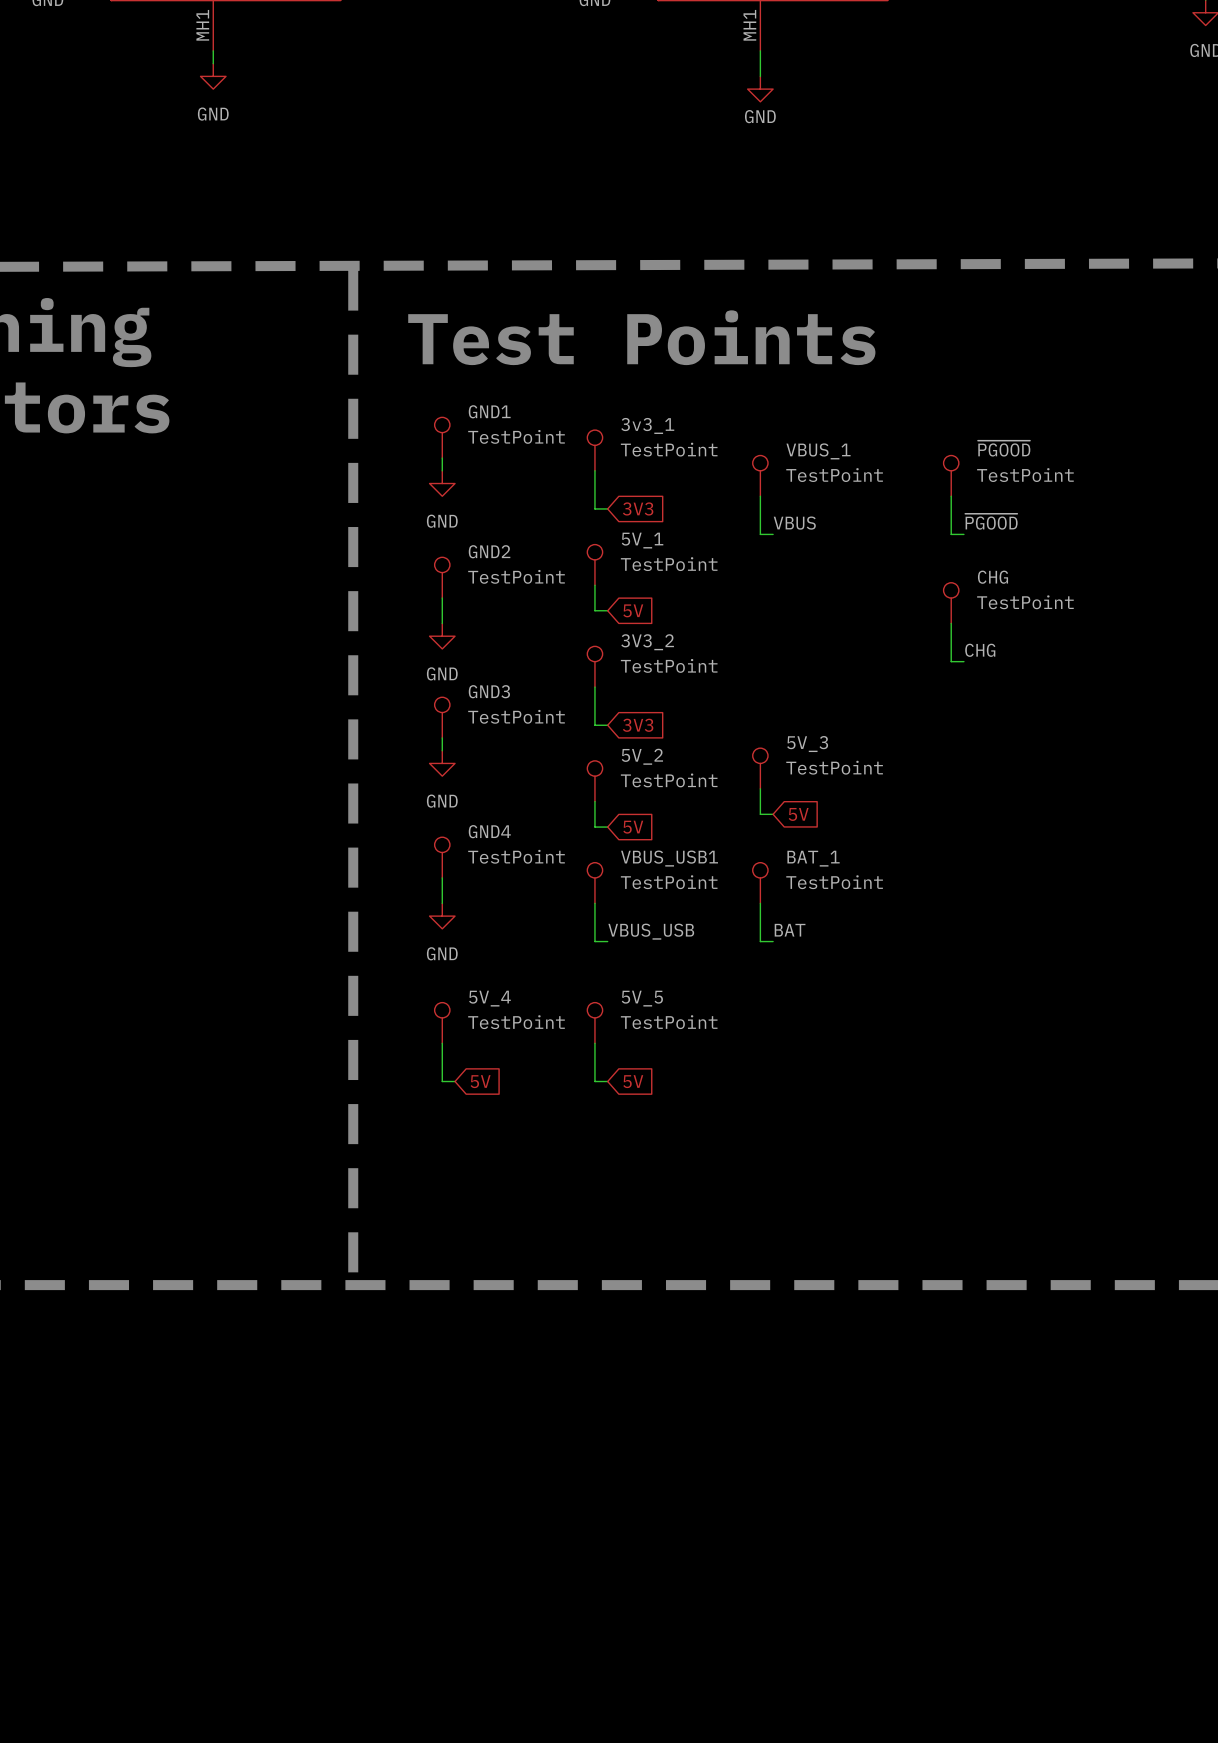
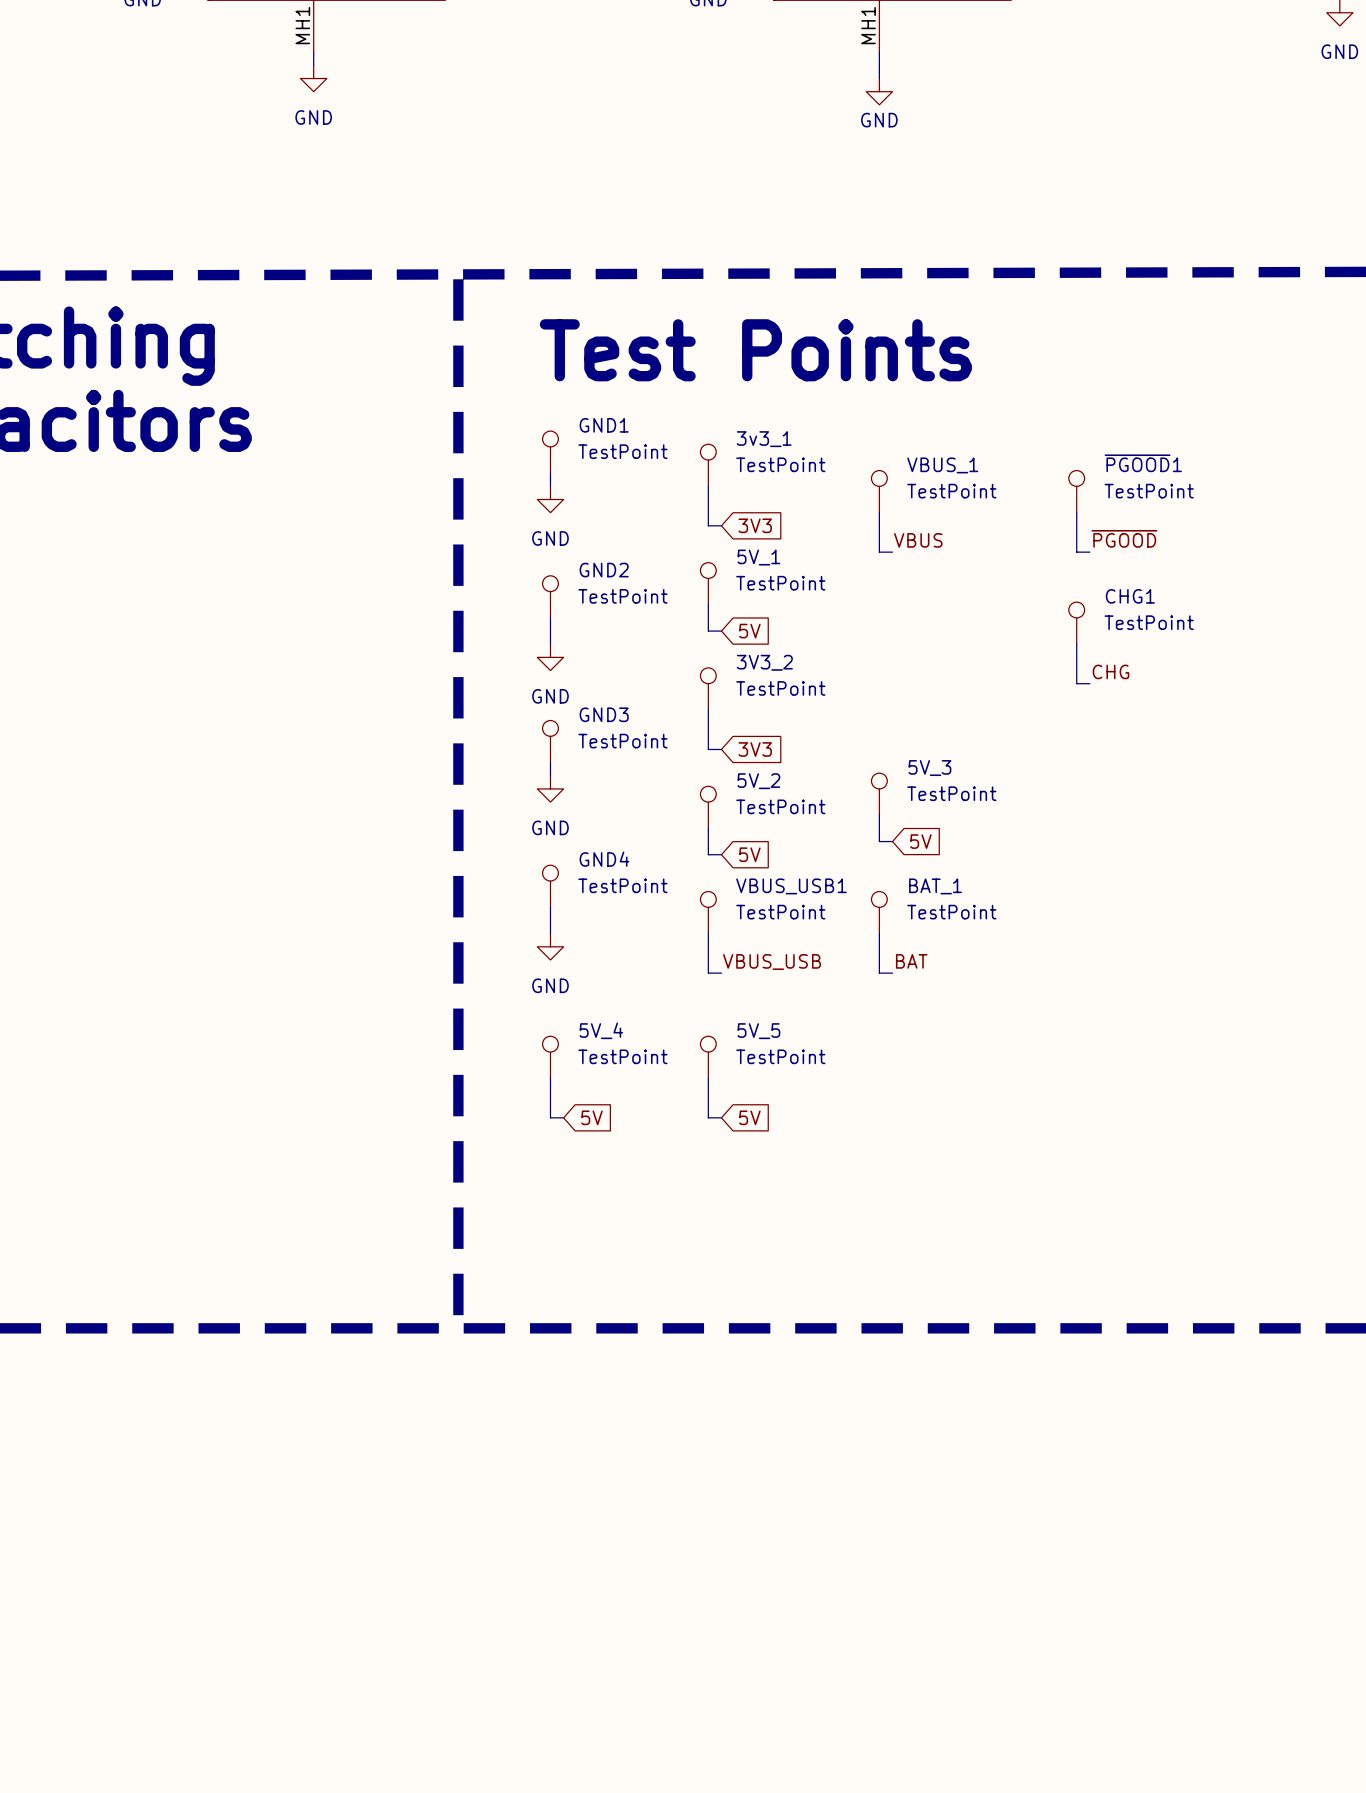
~{PGOOD} name: ~{PGOOD} (1004, 448) -> ~{PGOOD}1 (1143, 463)
CHG name: CHG (993, 577) -> CHG1 (1130, 596)

